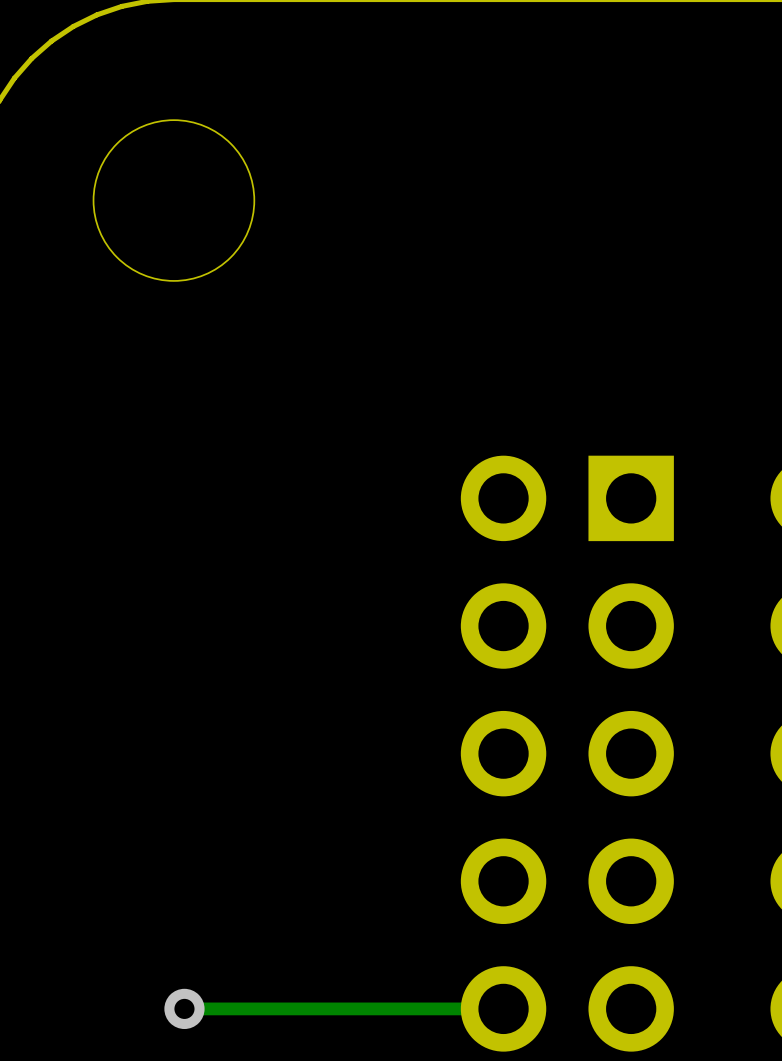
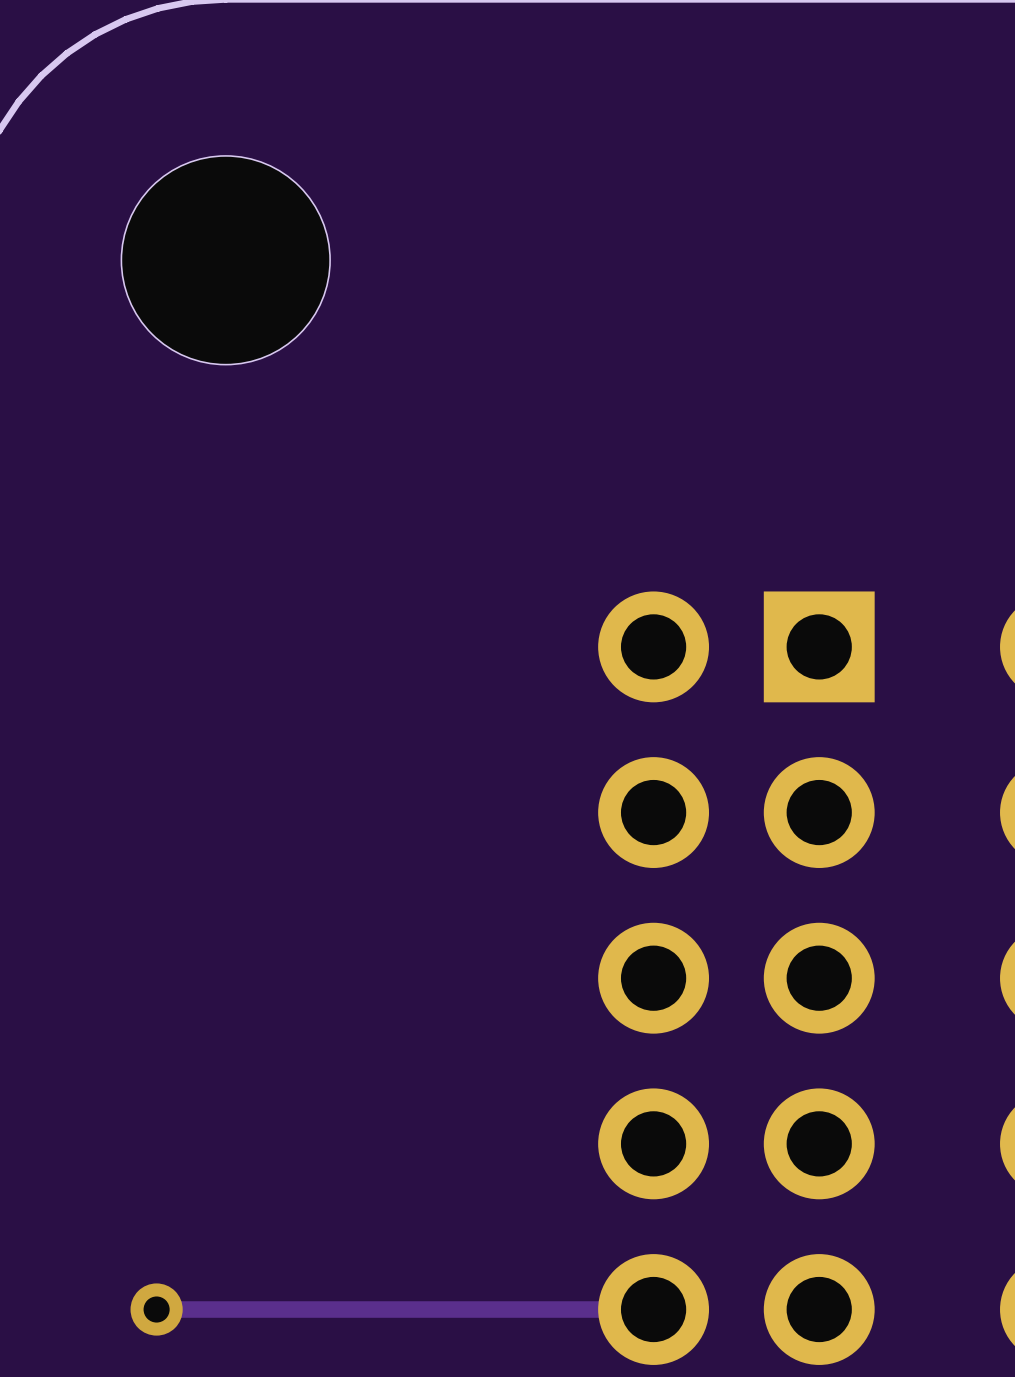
track: none -> (239, 1309) (156, 1309)
via position: (184, 1008) -> (156, 1309)

